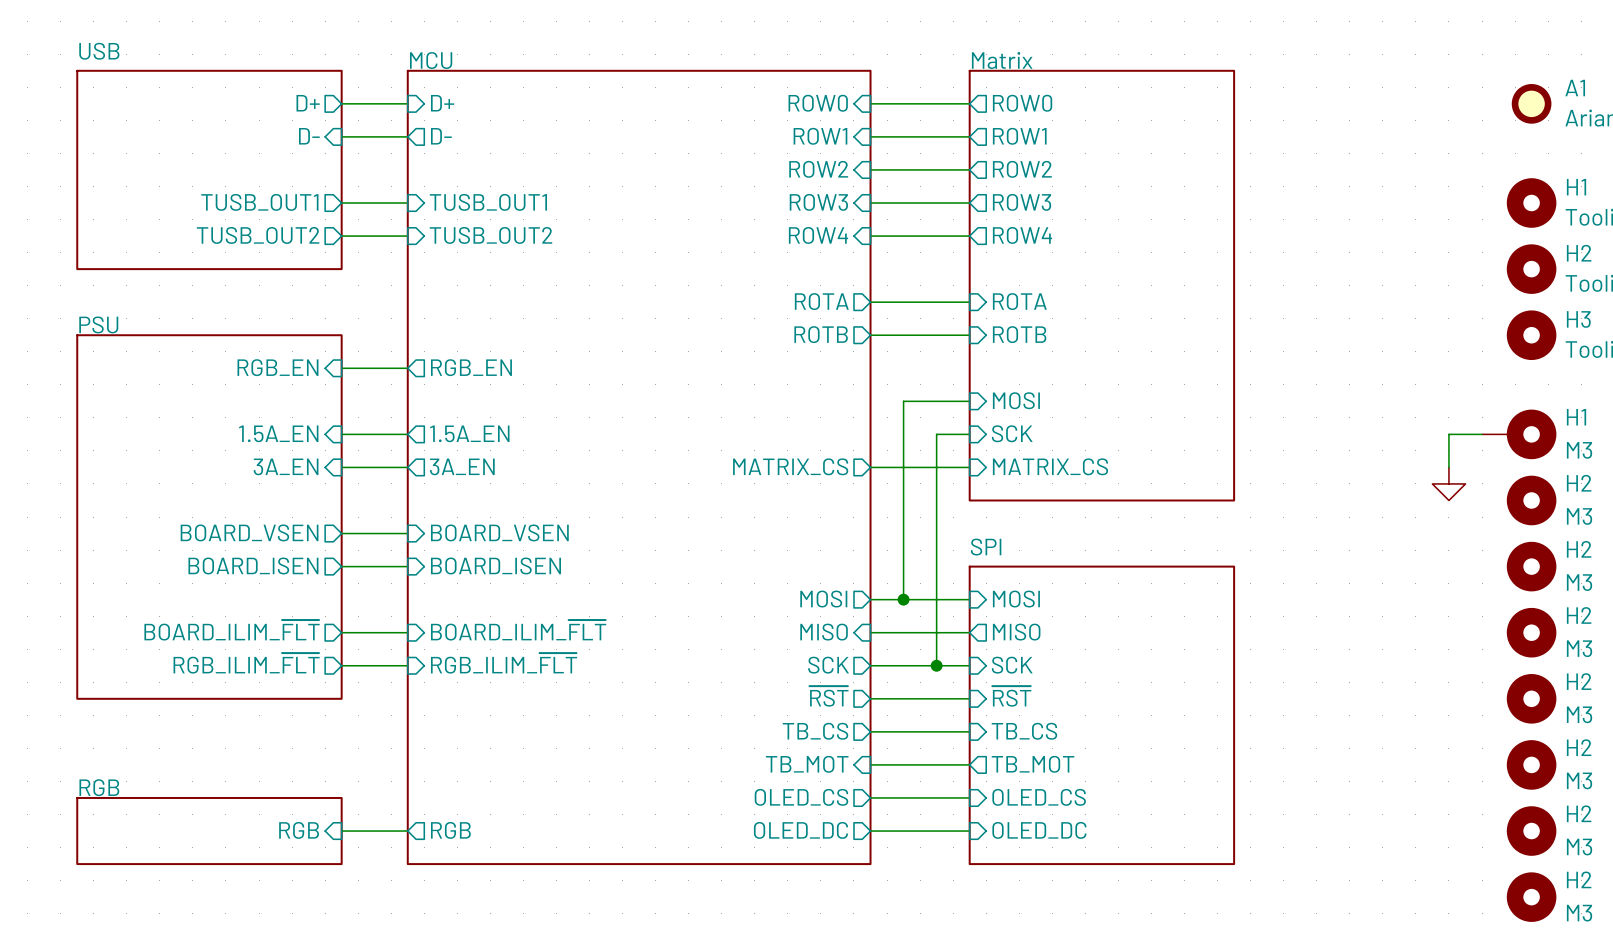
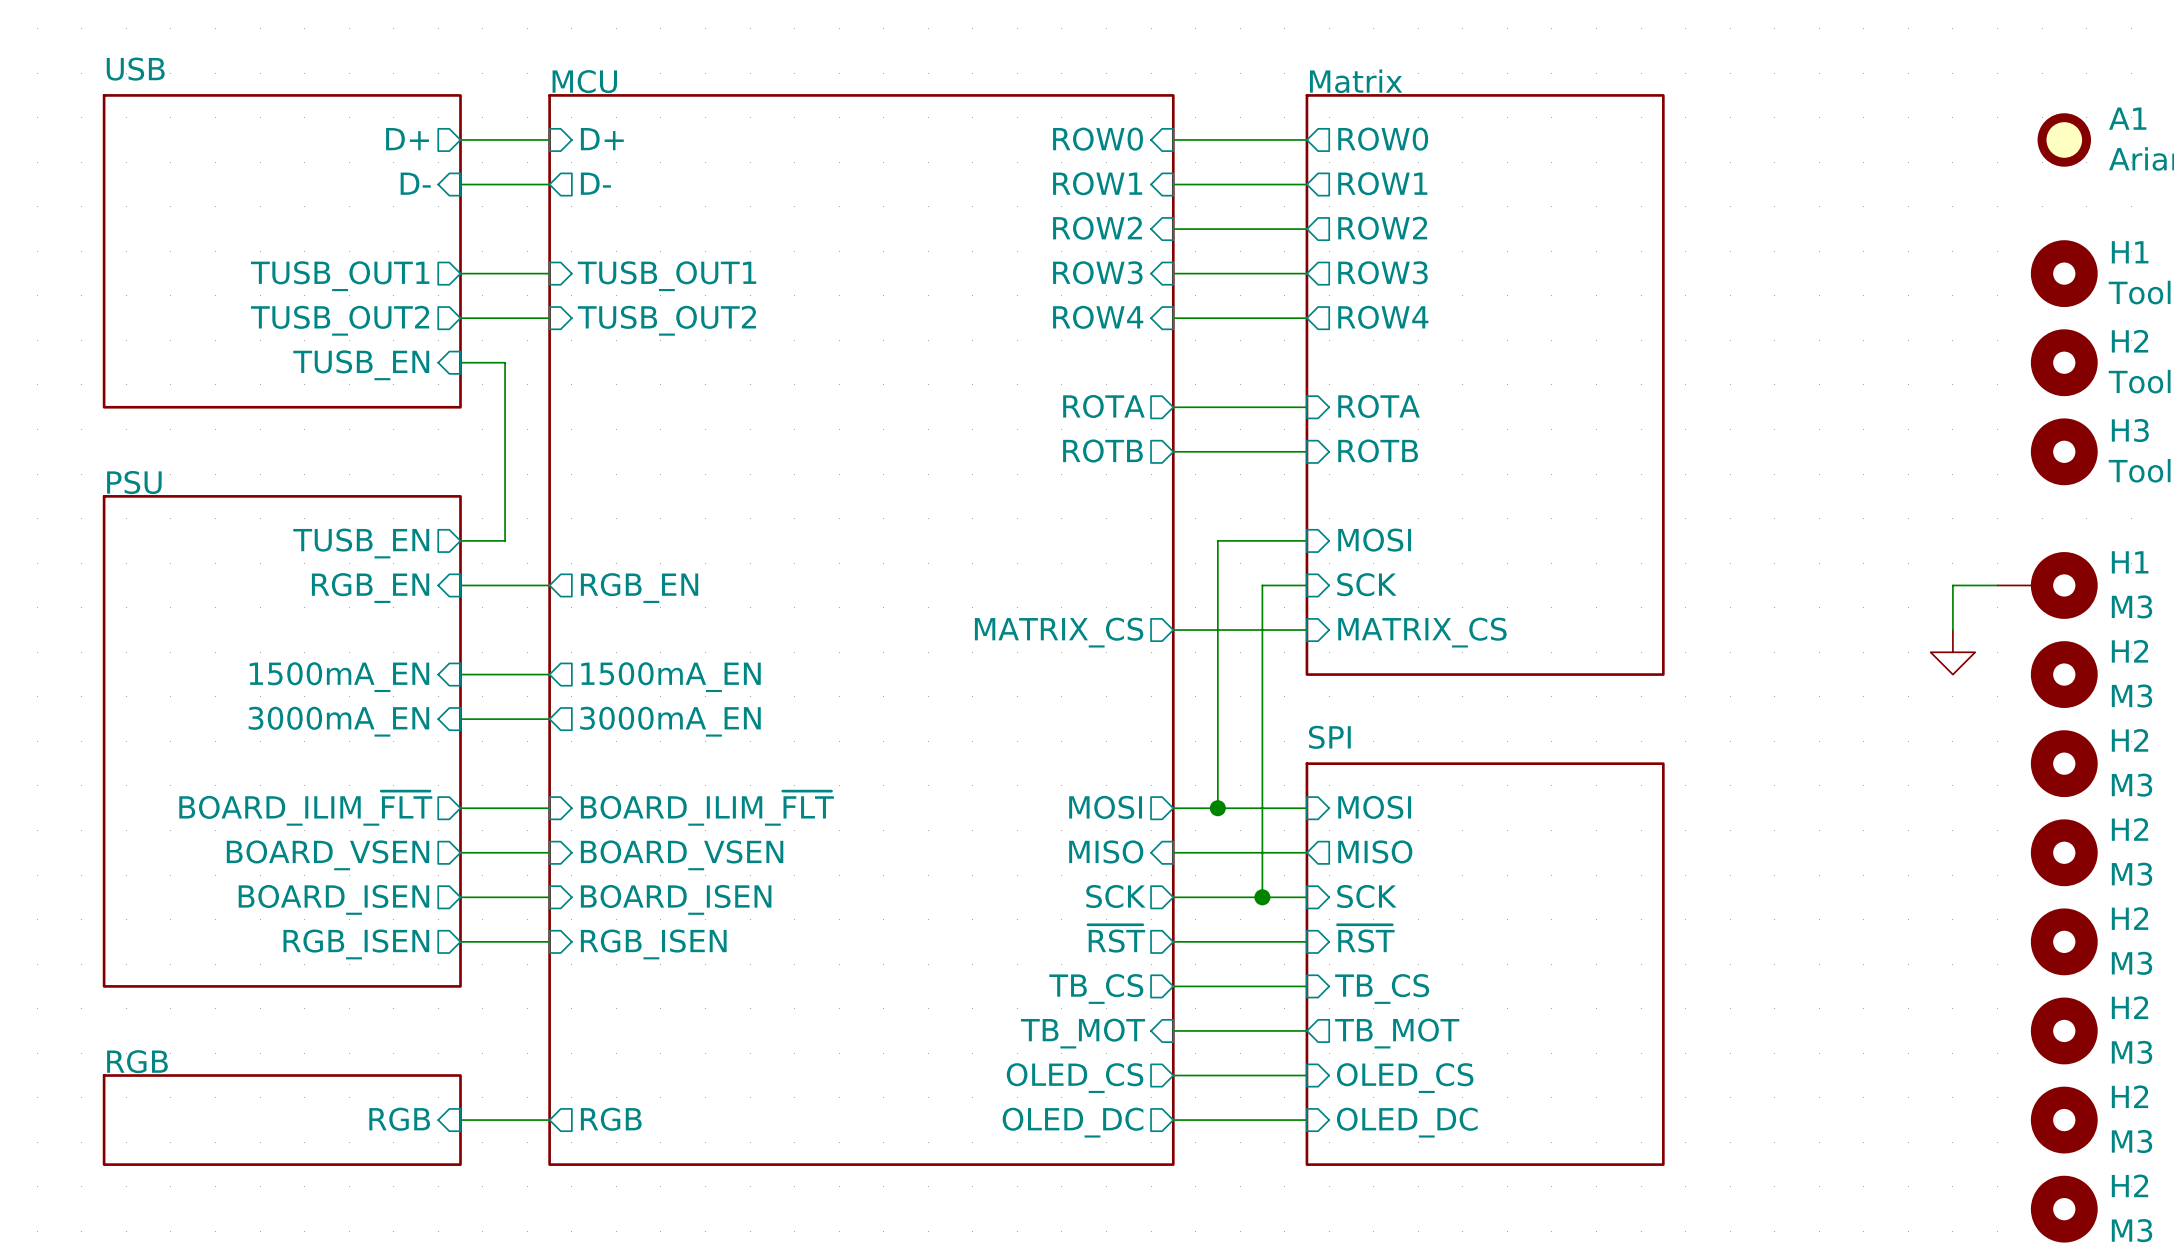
sheet USB: (209, 169) -> none
sheet USB: none -> (282, 251)
sheet pin: none -> TUSB_EN (361, 365)
wire: none -> (460, 362) (505, 362) (505, 540) (460, 540)
sheet pin shape: input (277, 367) -> output (361, 543)
sheet pin: RGB_EN (277, 367) -> TUSB_EN (361, 543)
sheet pin: RGB_EN (471, 367) -> none
wire: (341, 368) (407, 368) -> (460, 674) (549, 674)
sheet pin: 1.5A_EN (278, 433) -> RGB_EN (370, 588)
sheet pin: 1.5A_EN (469, 433) -> RGB_EN (639, 588)
sheet pin: 3A_EN (286, 466) -> none
sheet pin: 3A_EN (462, 466) -> none
wire: (341, 467) (407, 467) -> (460, 808) (549, 808)
sheet pin: none -> 1500mA_EN (339, 677)
sheet pin: none -> 1500mA_EN (670, 677)
sheet PSU position: (209, 517) -> (282, 741)
sheet pin shape: output (249, 532) -> input (338, 721)
sheet pin: BOARD_VSEN (249, 532) -> 3000mA_EN (338, 721)
sheet pin shape: input (499, 532) -> output (670, 721)
sheet pin: BOARD_VSEN (499, 532) -> 3000mA_EN (670, 721)
sheet pin: BOARD_ISEN (253, 565) -> none
sheet pin: BOARD_ISEN (495, 565) -> none
wire: (341, 566) (407, 566) -> (460, 941) (549, 941)
sheet pin: none -> BOARD_ILIM_~{FLT} (305, 808)
sheet pin: none -> BOARD_ILIM_~{FLT} (707, 808)
sheet pin: BOARD_ILIM_~{FLT} (232, 630) -> BOARD_VSEN (328, 855)
sheet pin: BOARD_ILIM_~{FLT} (518, 630) -> BOARD_VSEN (682, 855)
sheet pin: RGB_ILIM_~{FLT} (246, 663) -> BOARD_ISEN (333, 899)
sheet pin: RGB_ILIM_~{FLT} (504, 663) -> BOARD_ISEN (676, 899)
sheet pin: none -> RGB_ISEN (356, 944)
sheet pin: none -> RGB_ISEN (653, 944)

